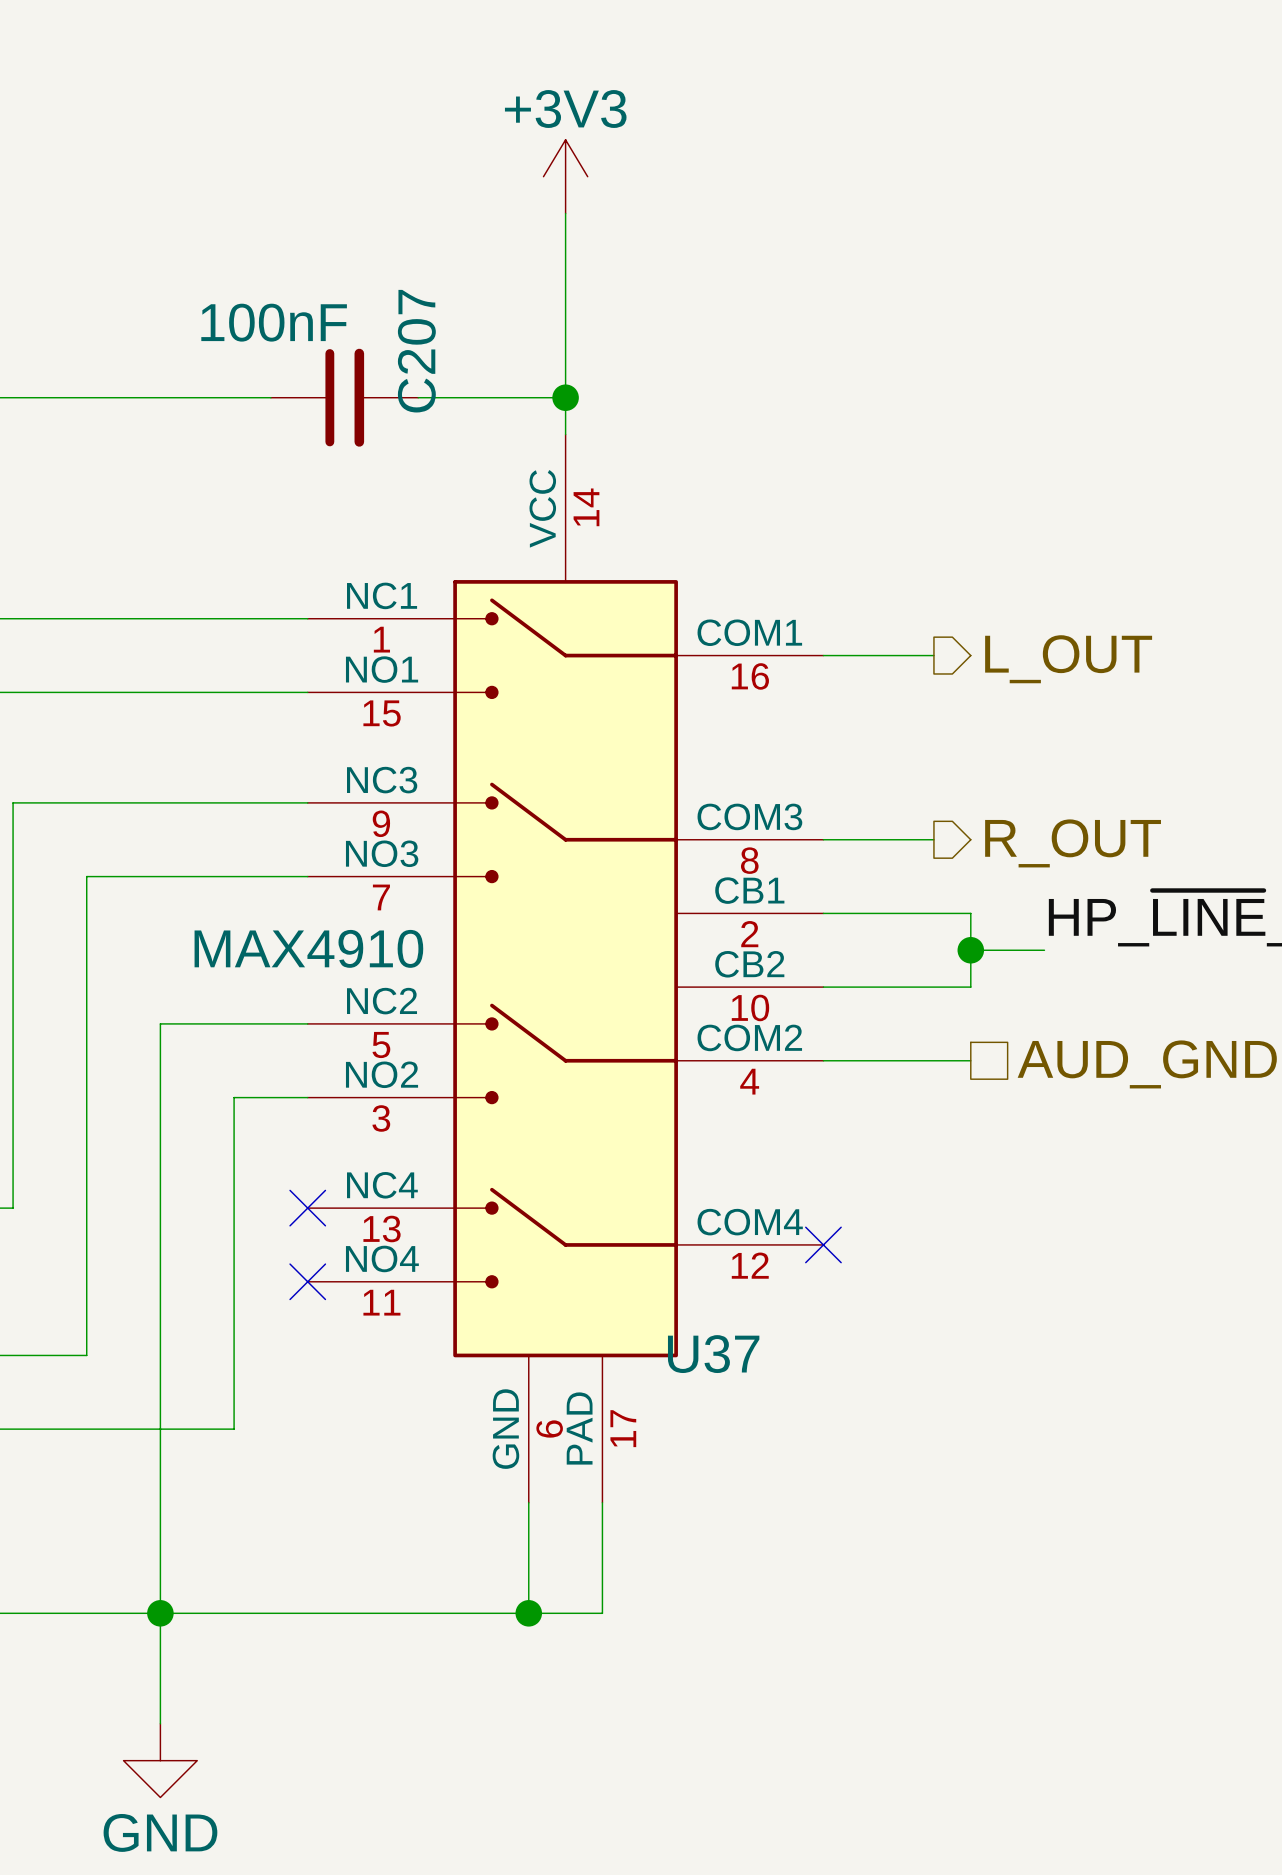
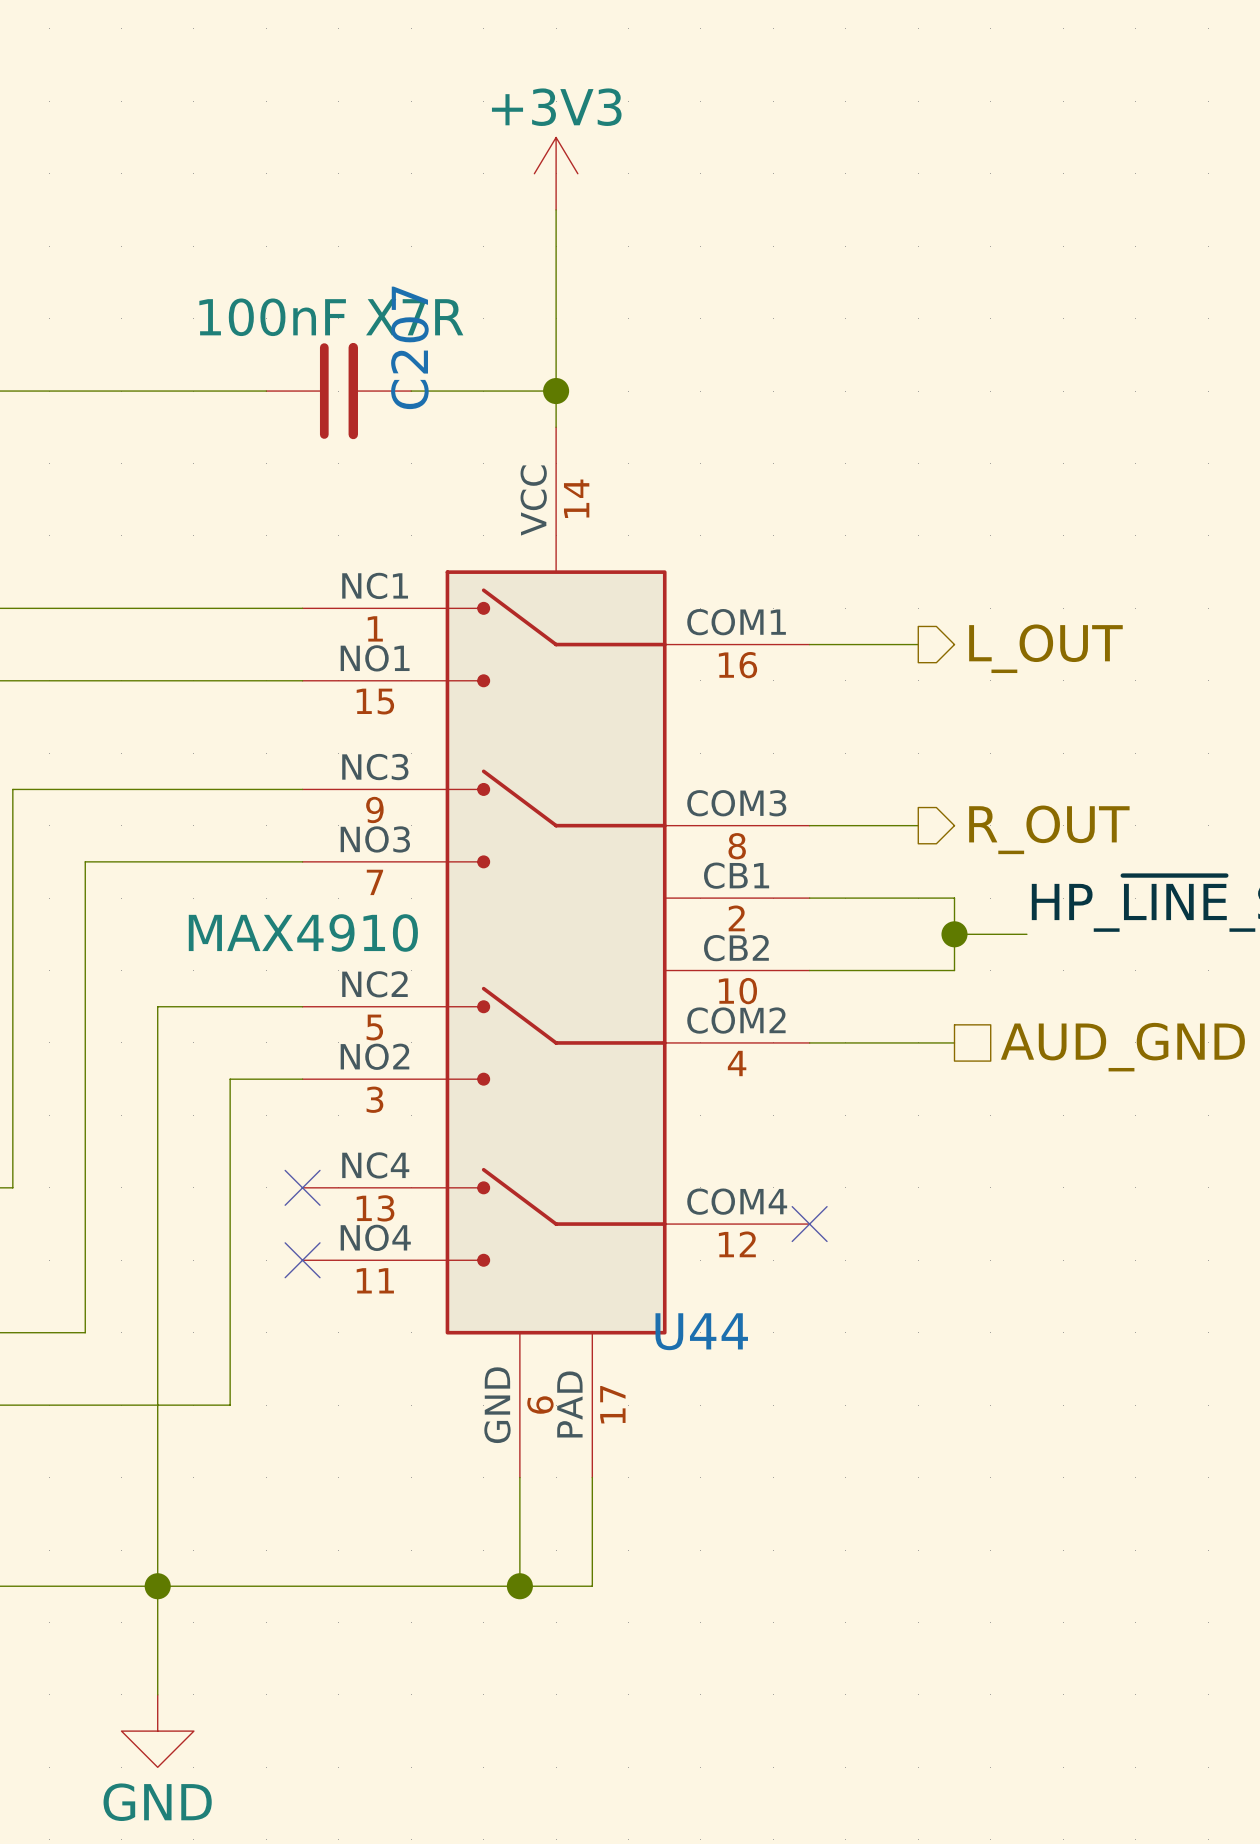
C207 value: 100nF (274, 322) -> 100nF X7R (331, 317)
U37 name: U37 (713, 1354) -> U44 (701, 1331)

